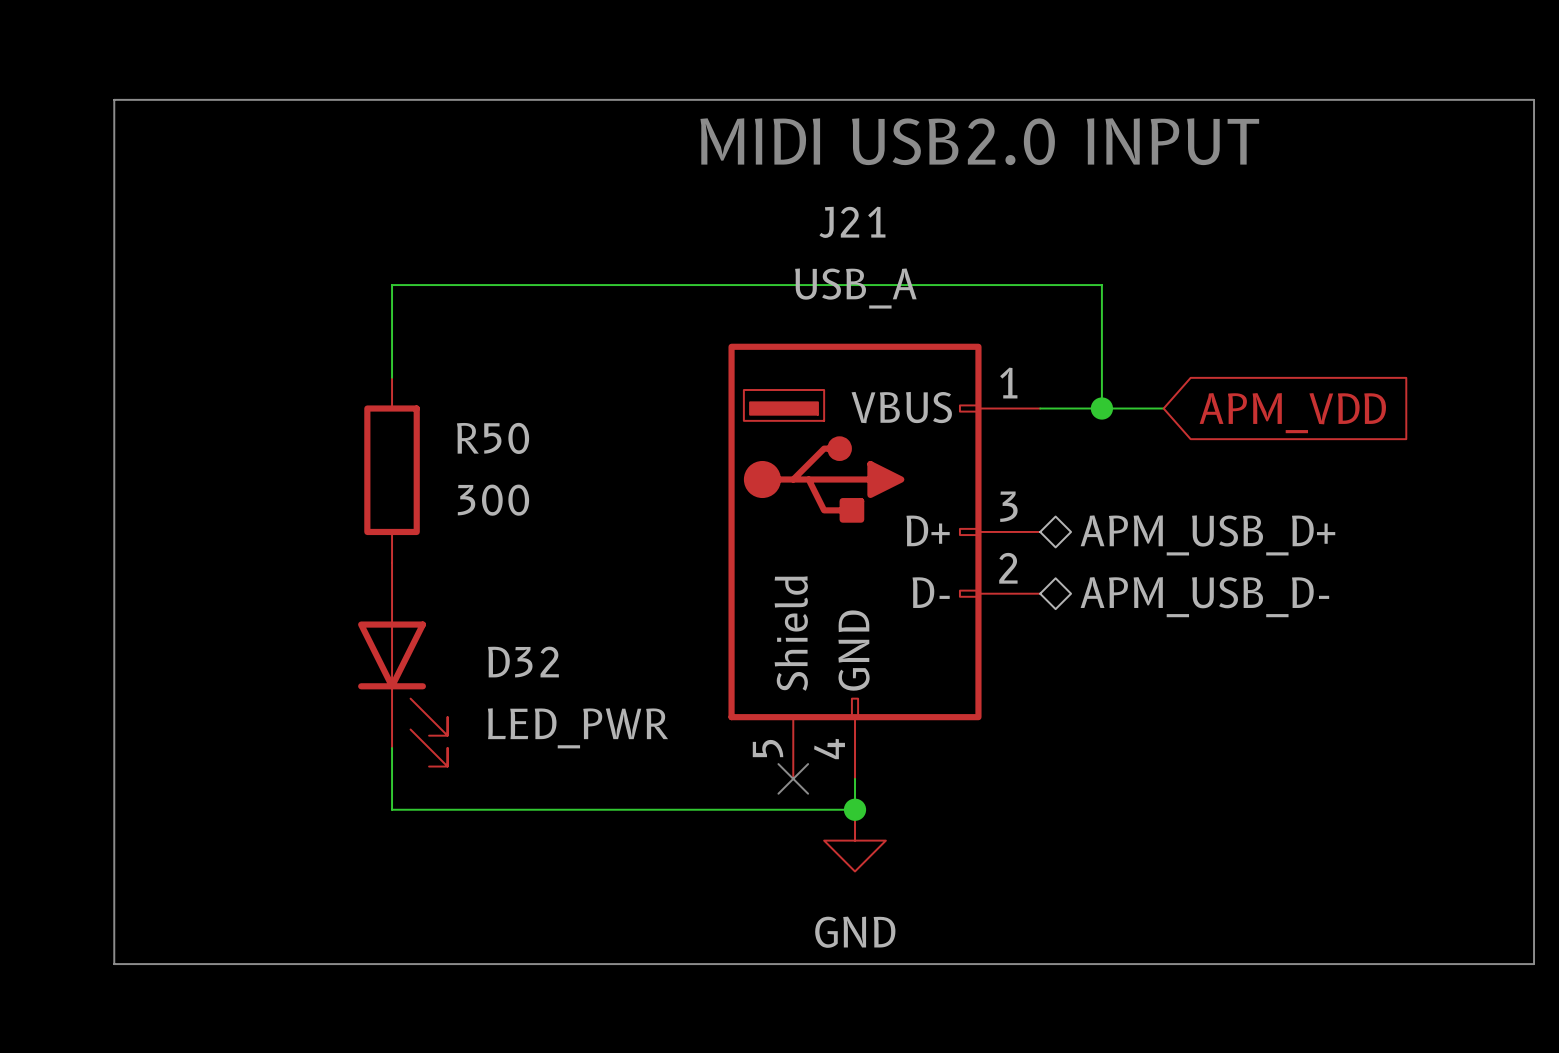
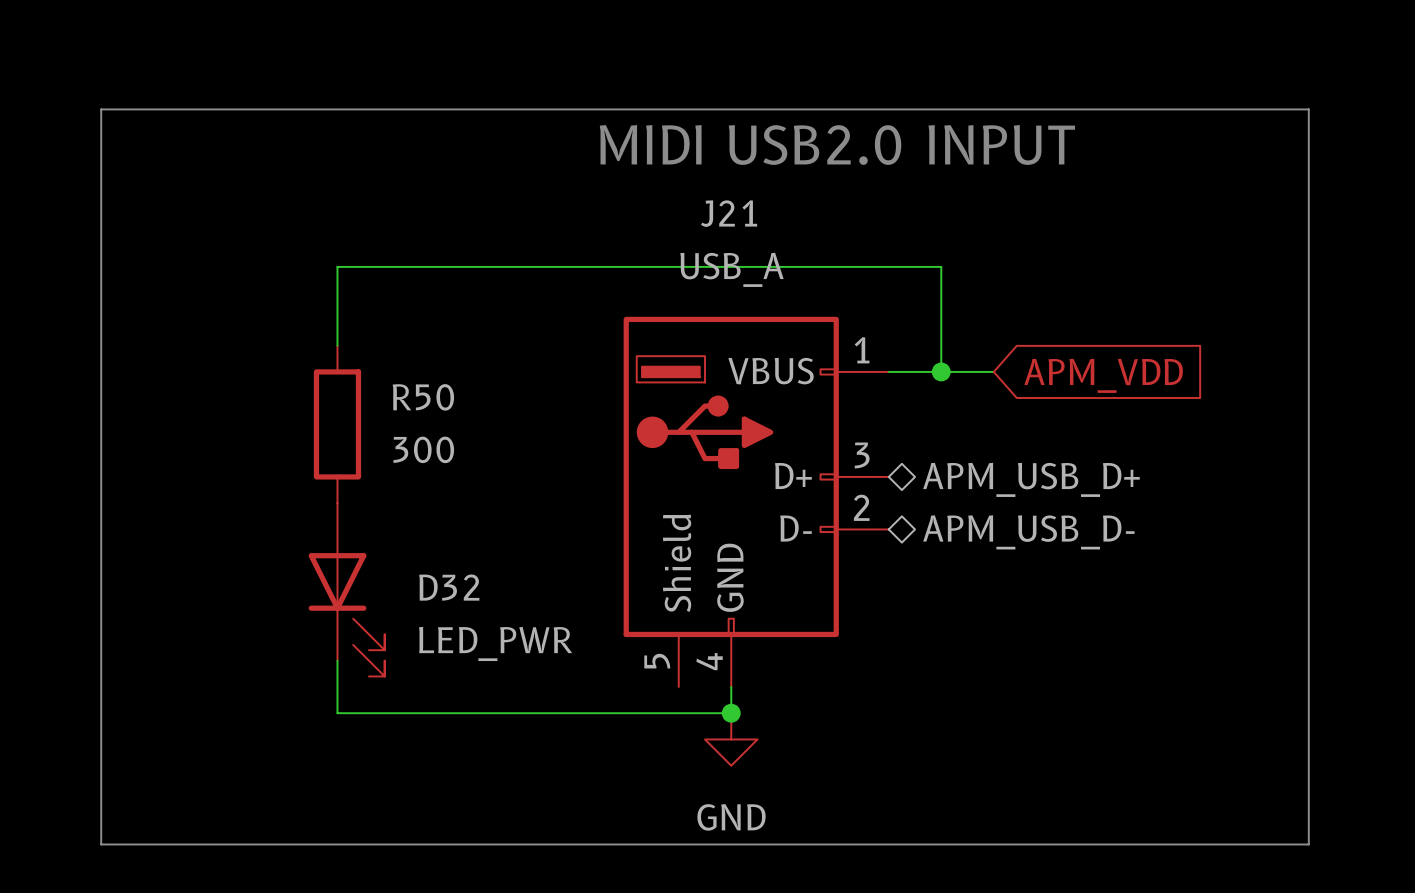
no-connect mark: (793, 778) -> none

